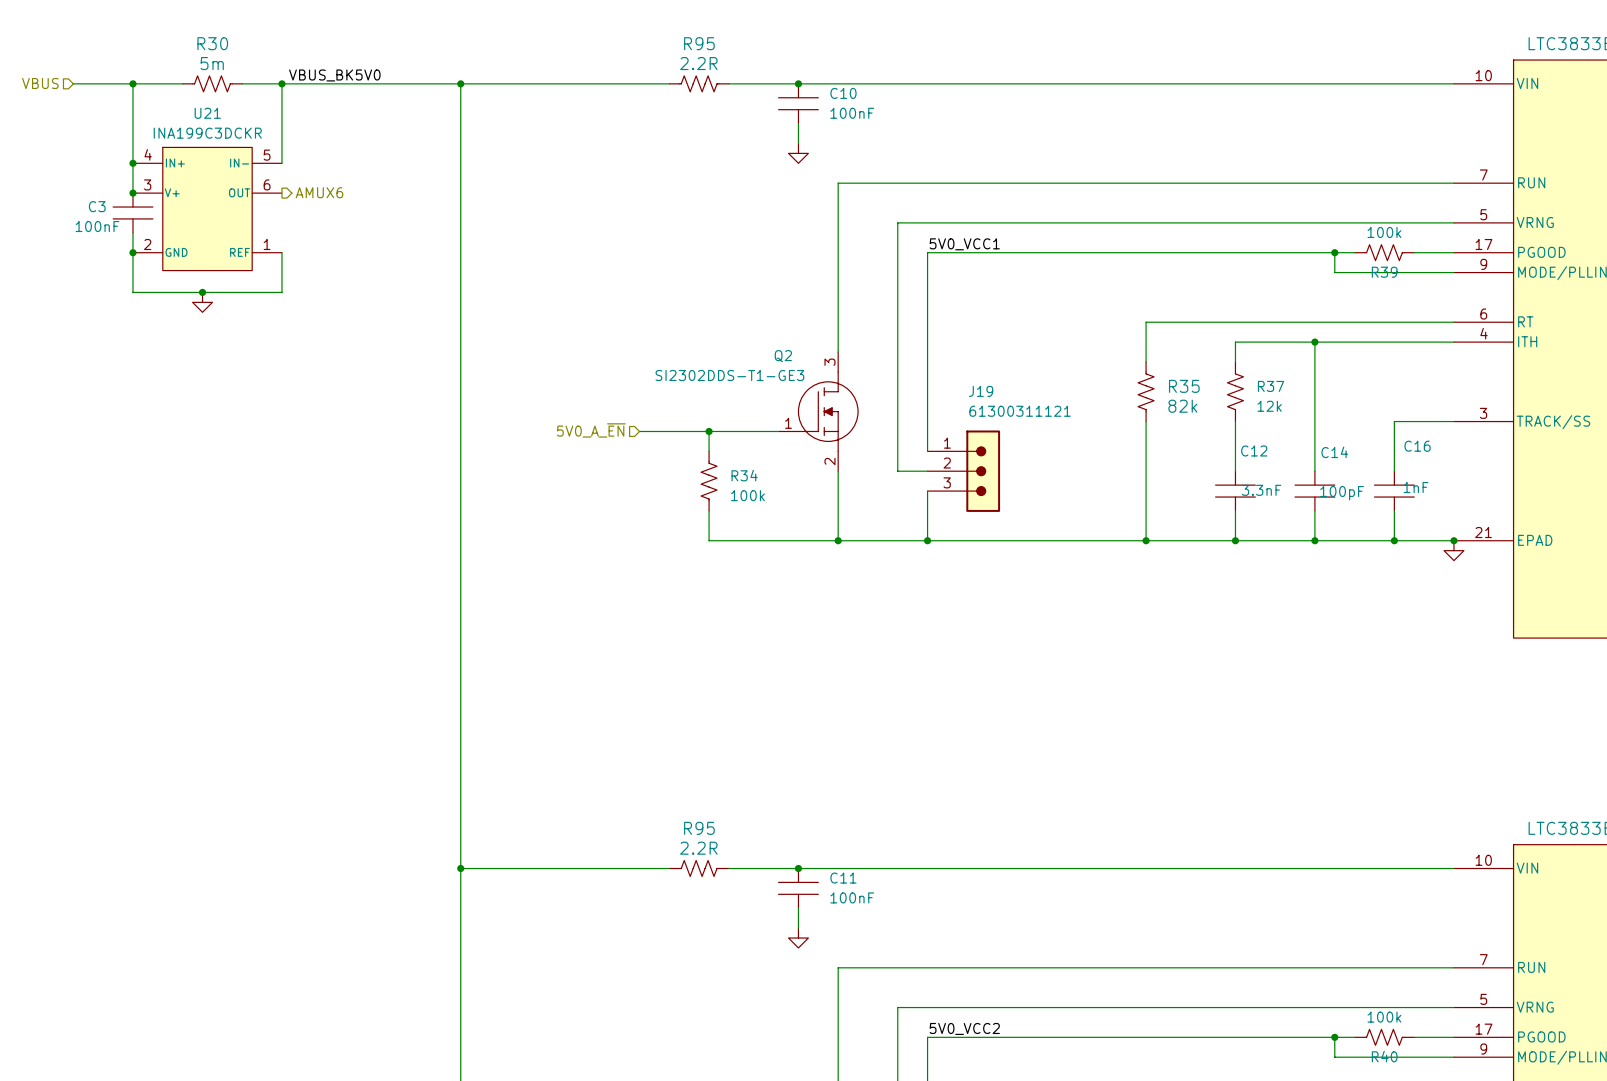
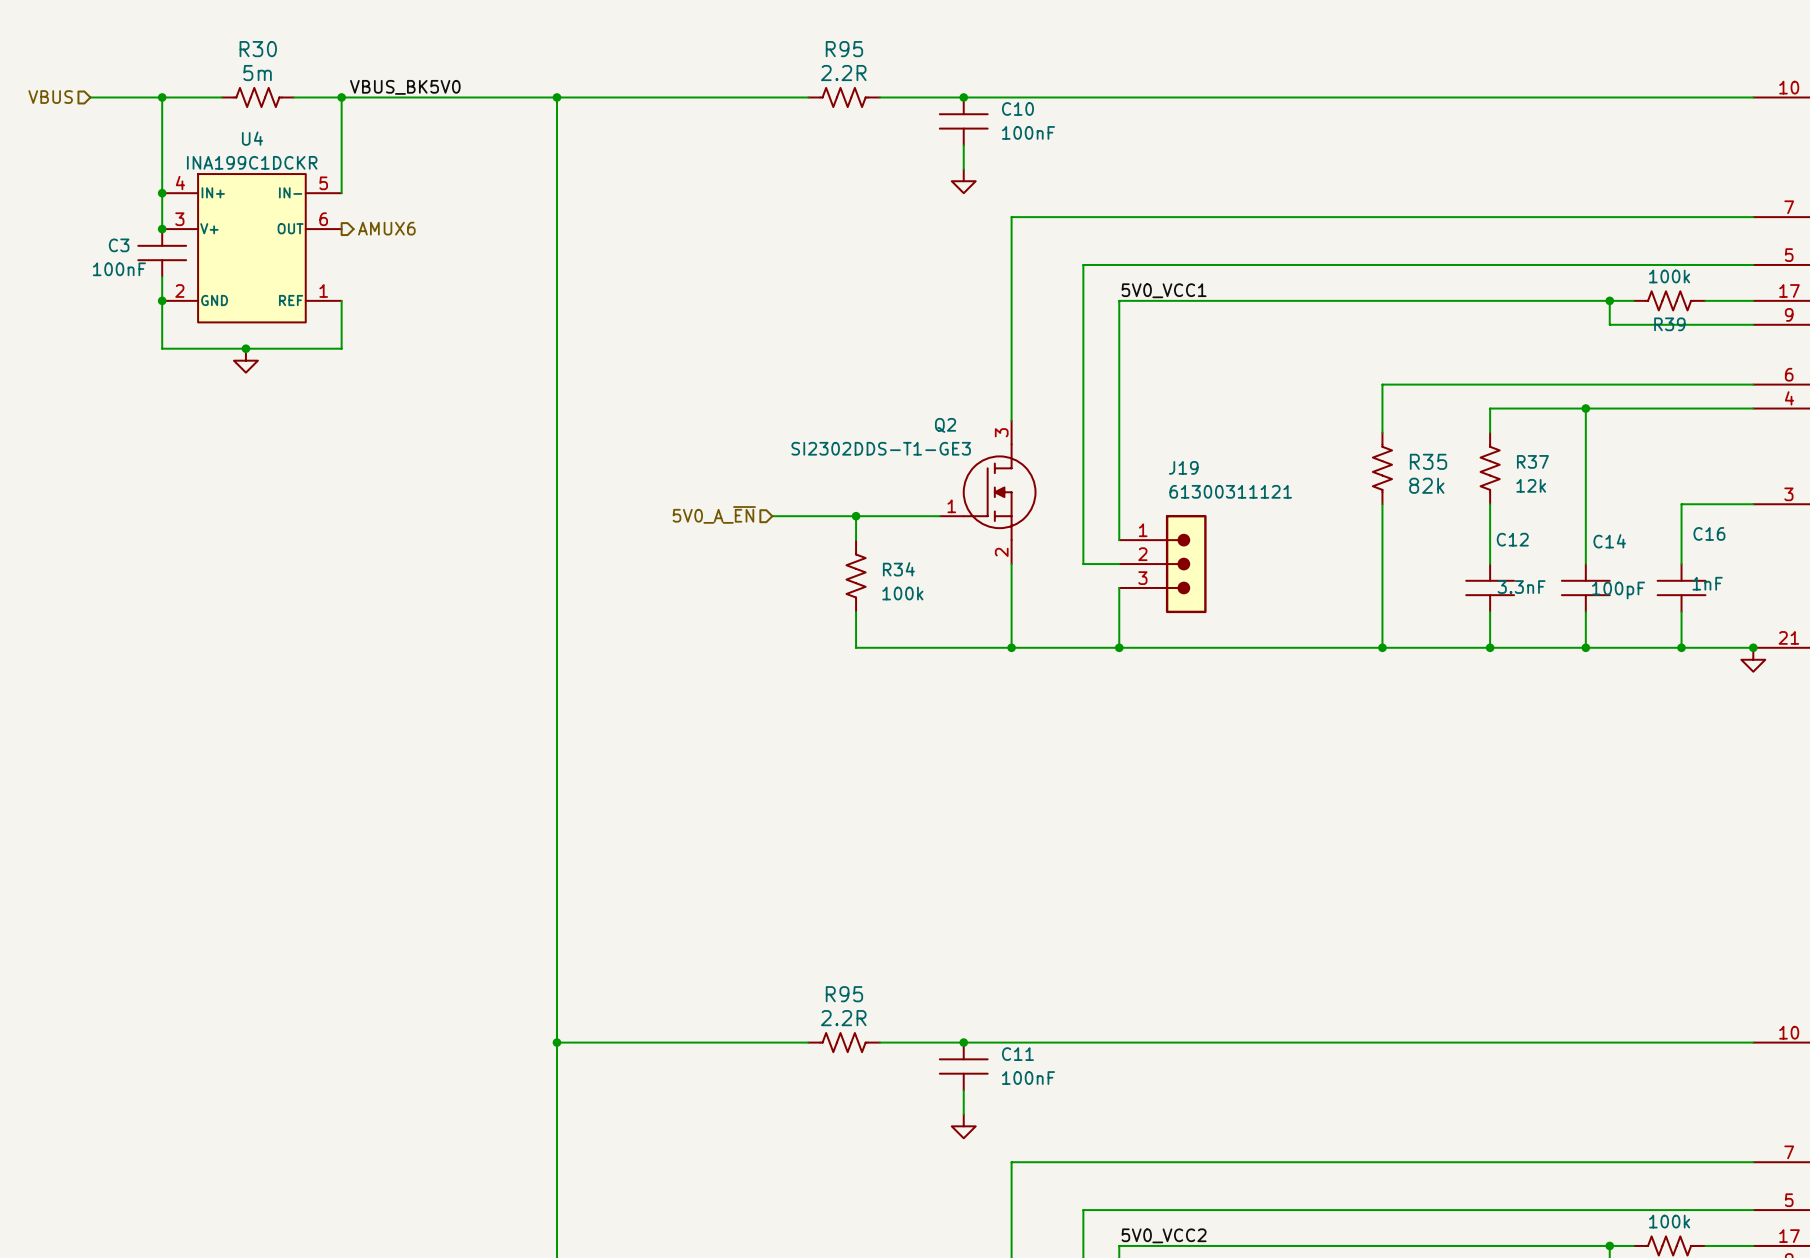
U21 name: U21 (207, 113) -> U4 (252, 138)
U21 value: INA199C3DCKR (207, 133) -> INA199C1DCKR (252, 162)

